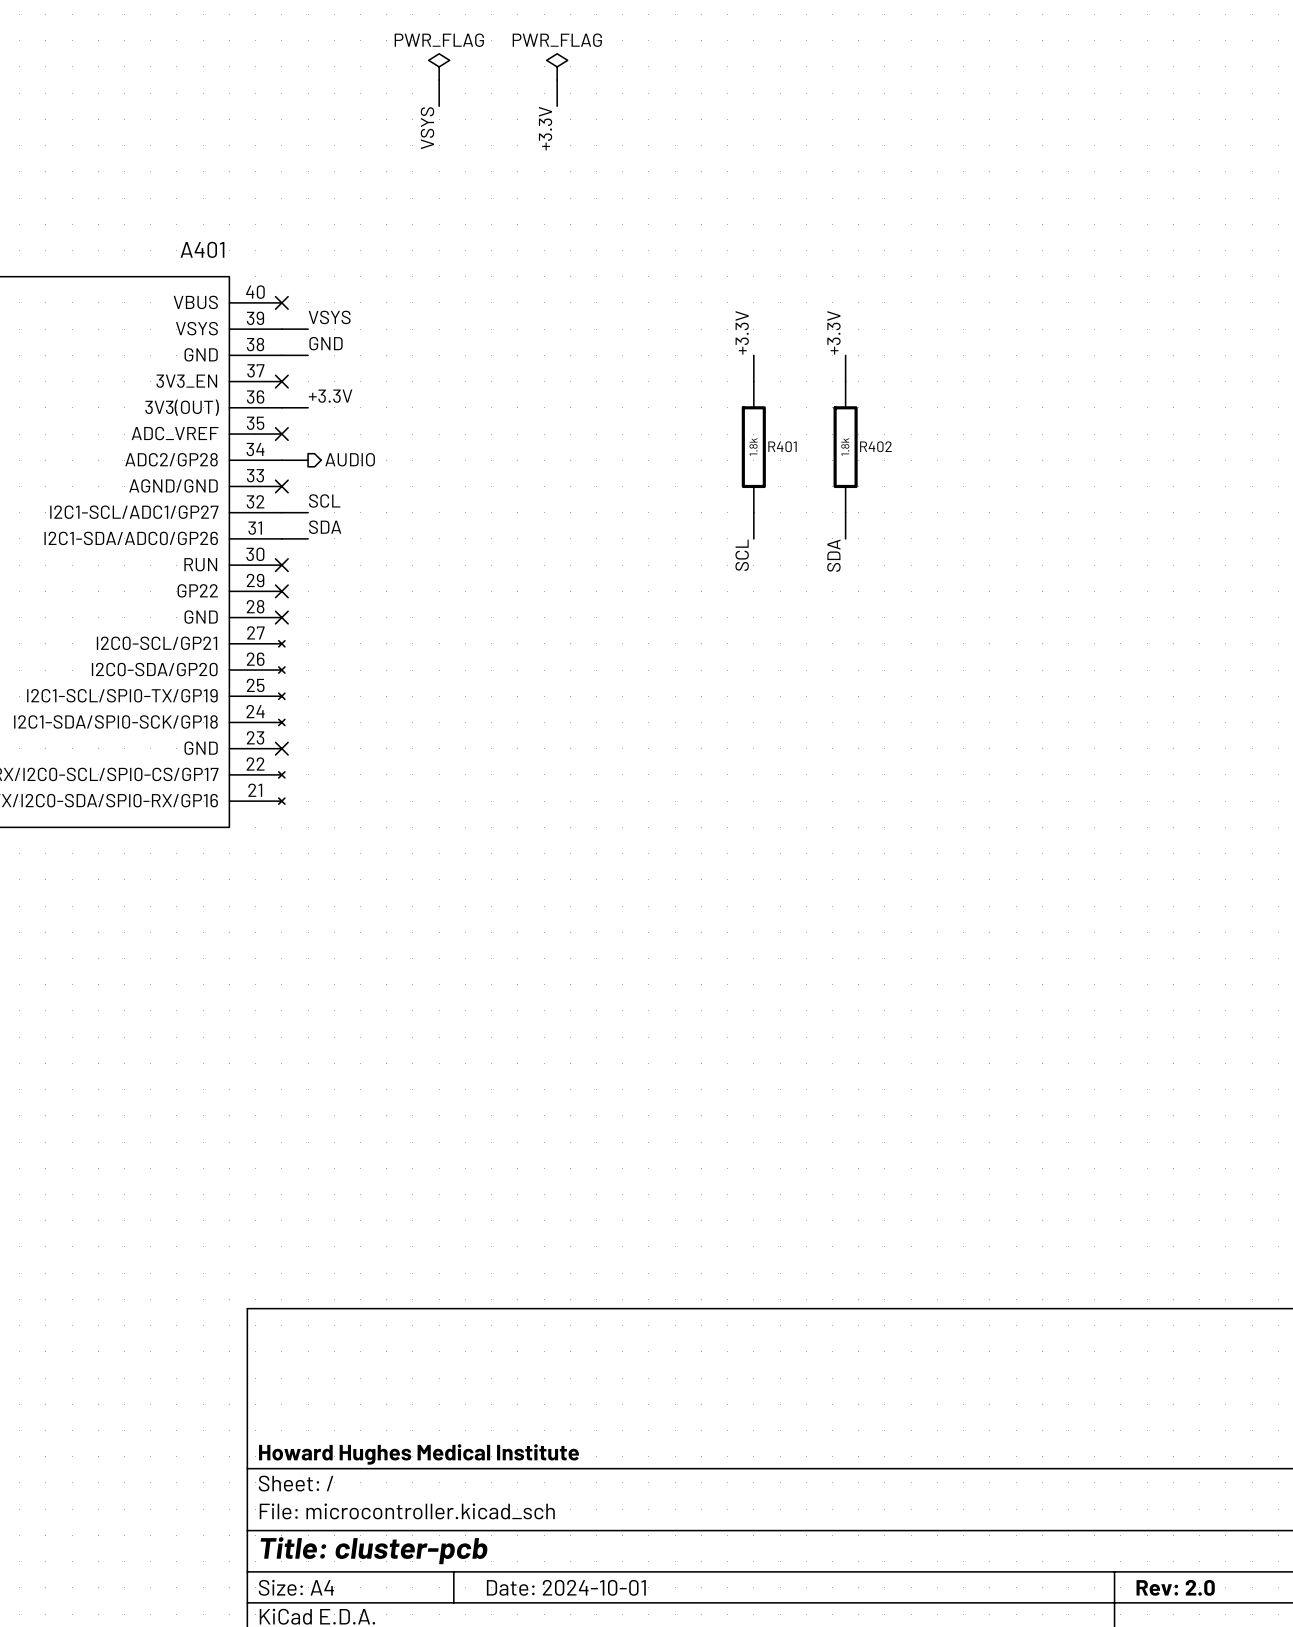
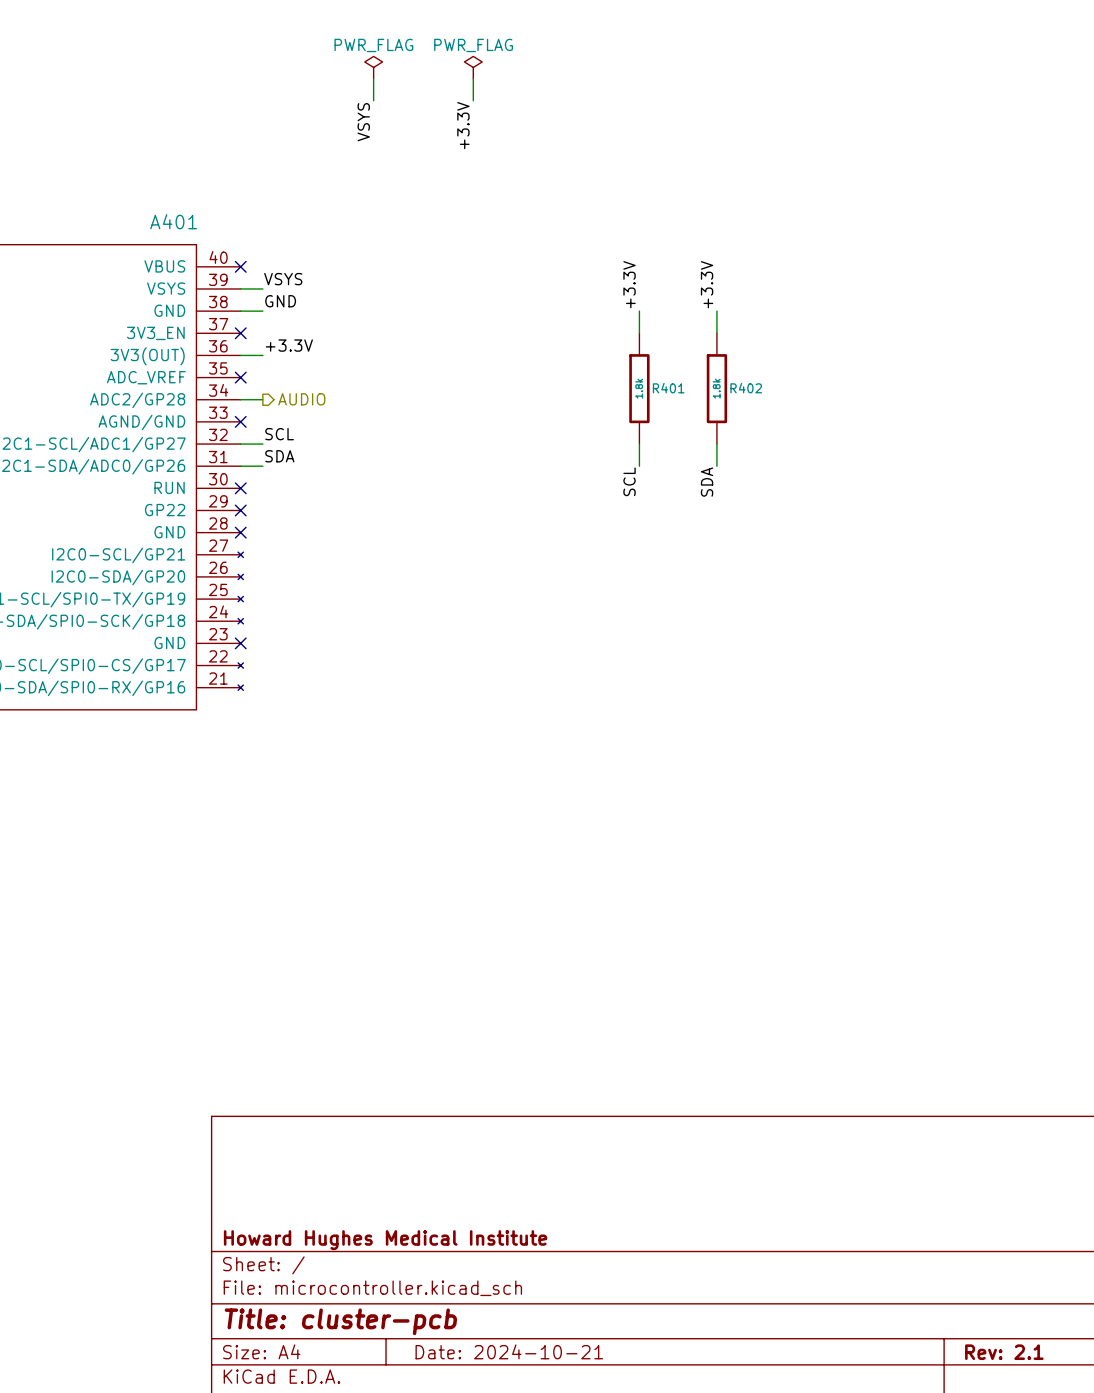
title block: Date: 2024-10-01 (566, 1587) -> Date: 2024-10-21 (509, 1351)
title block: Rev: 2.0 (1175, 1587) -> Rev: 2.1 (1004, 1352)

